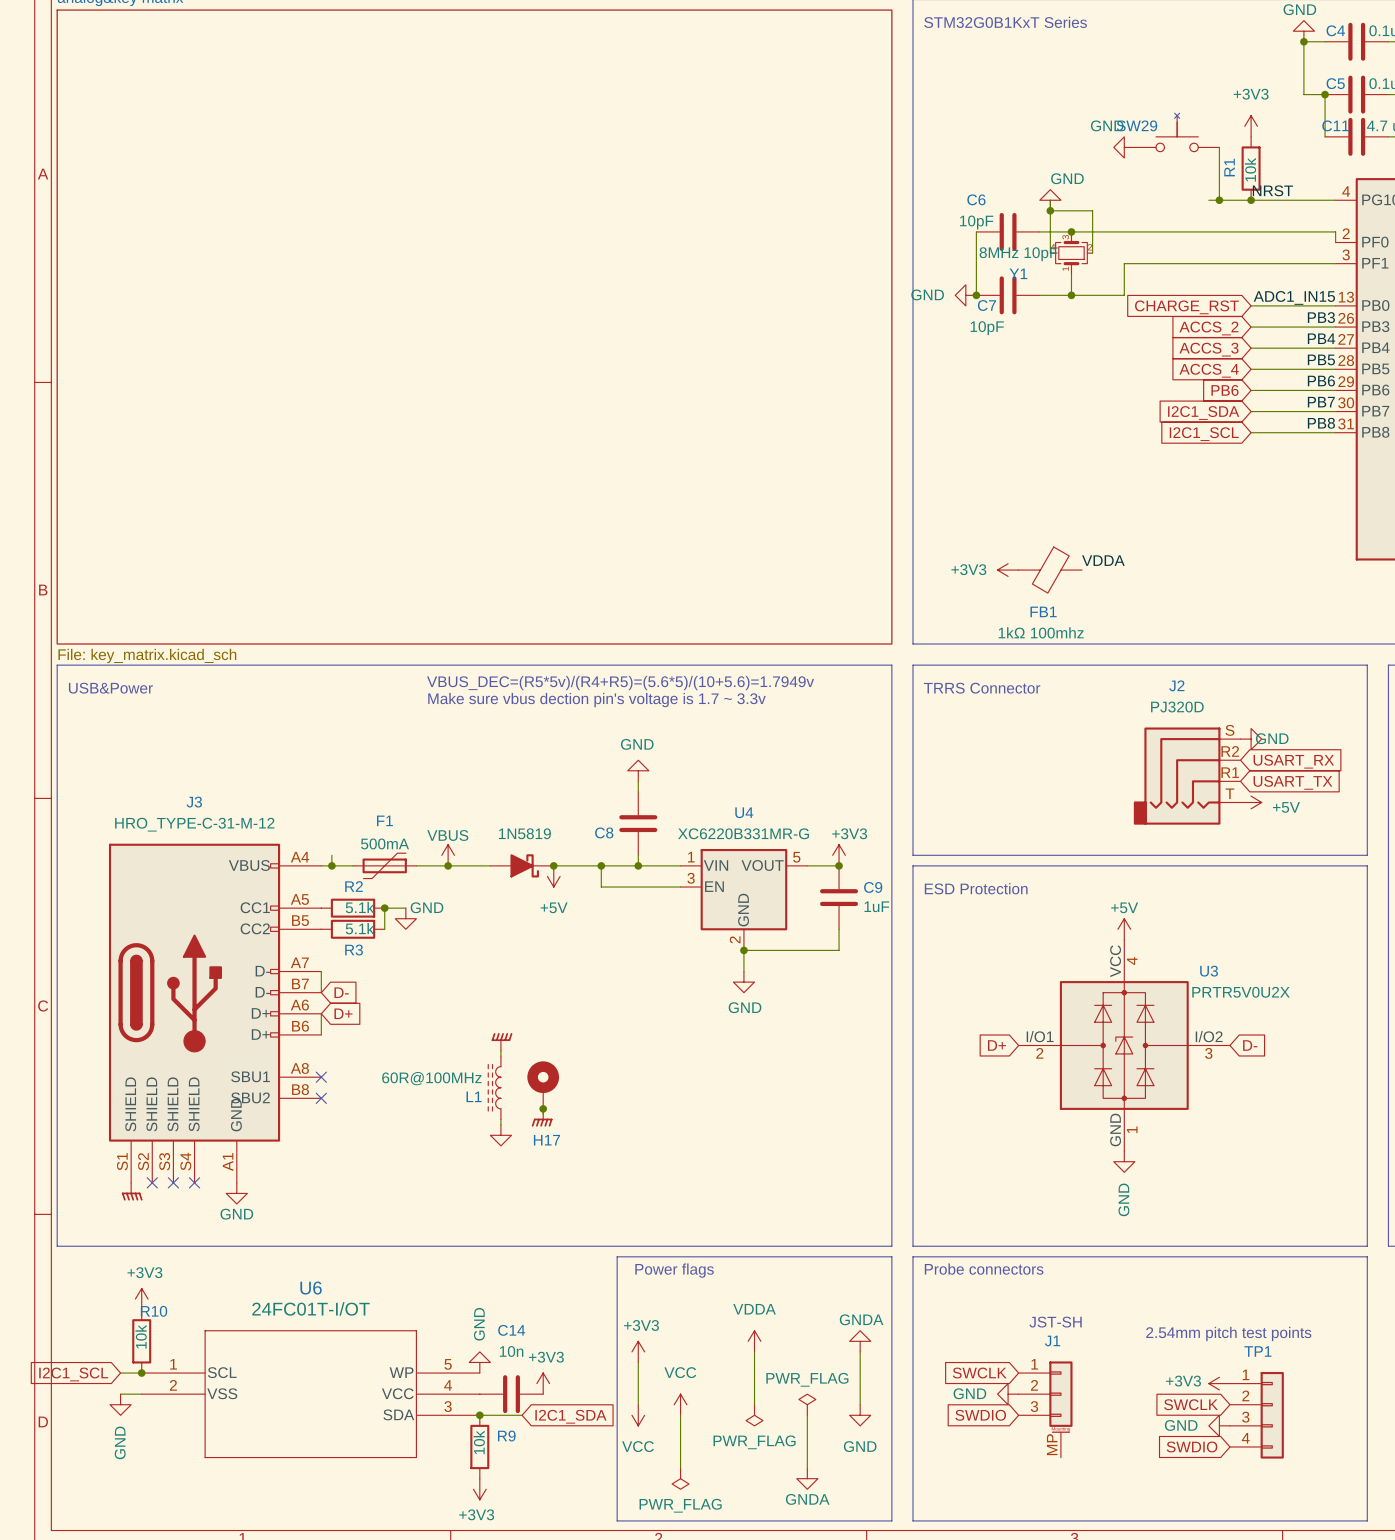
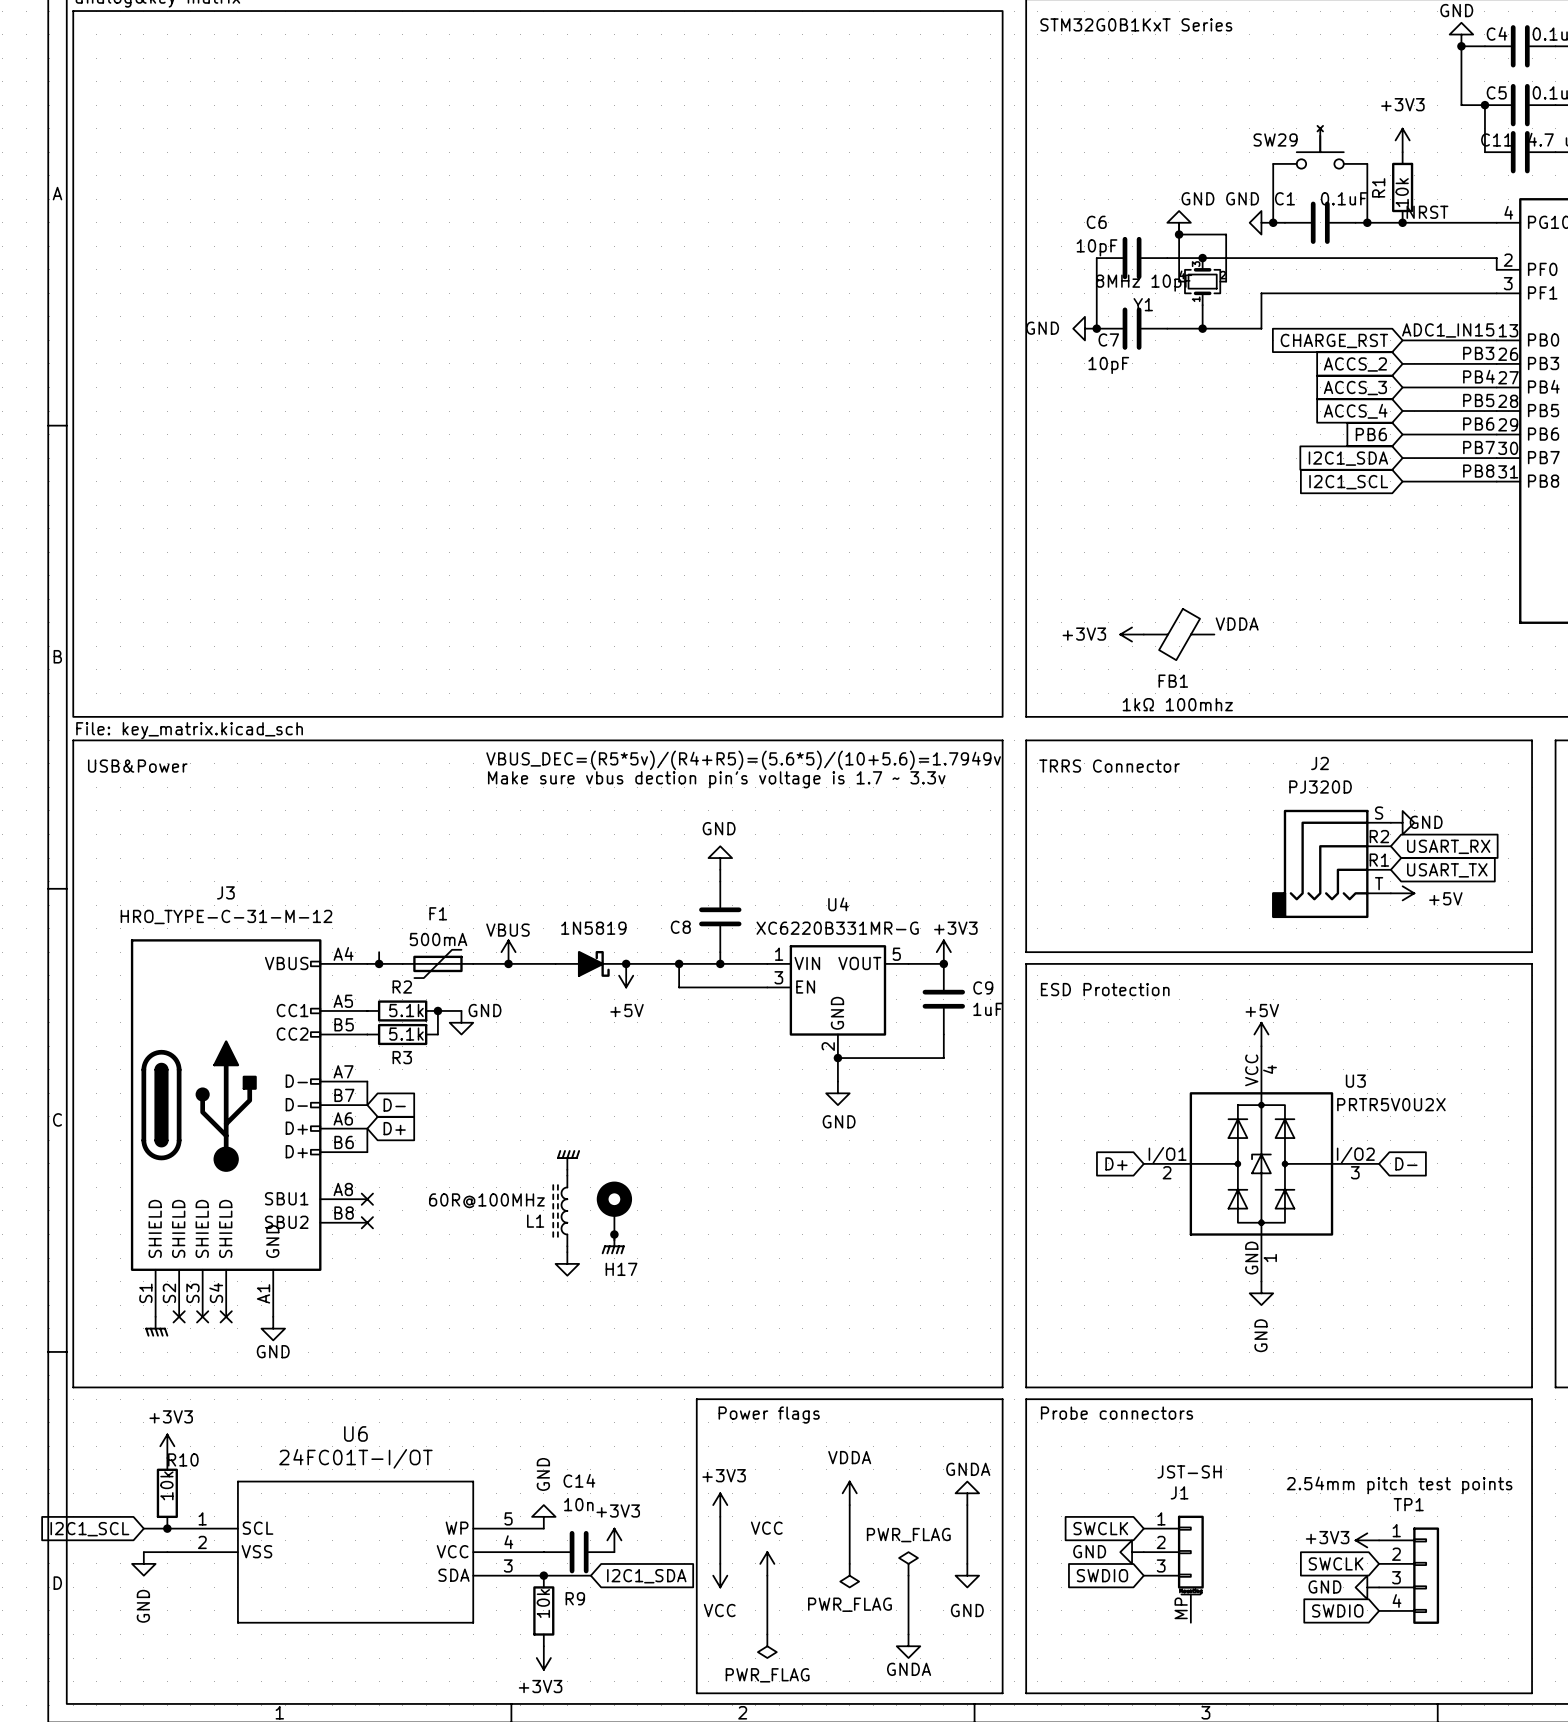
power symbol position: GND (1124, 147) -> GND (1261, 222)
wire: none -> (1273, 163) (1273, 222) (1284, 222)
junction: none -> (1273, 222)
C1: none -> 0.1uF (1320, 222)

